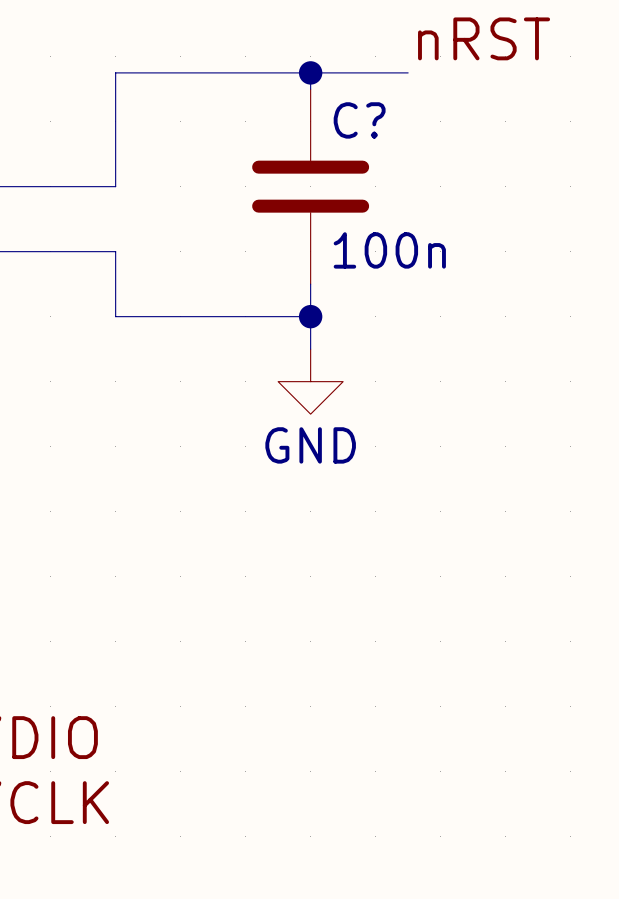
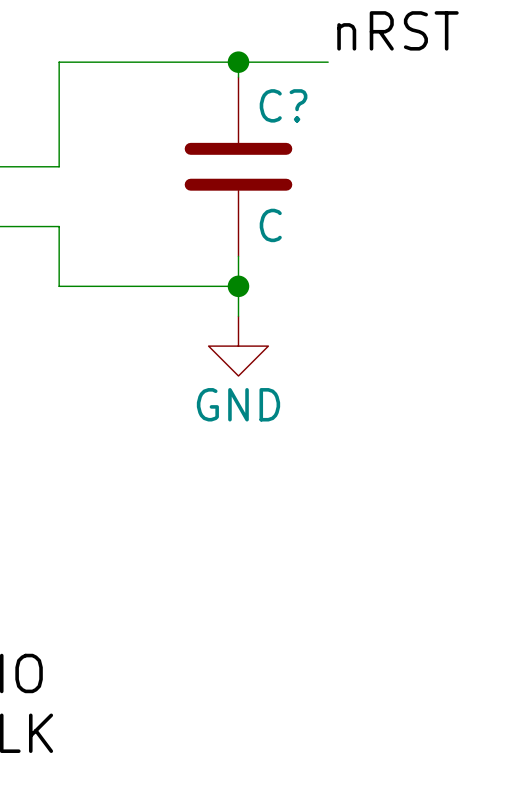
C? value: 100n (389, 250) -> C (270, 225)

